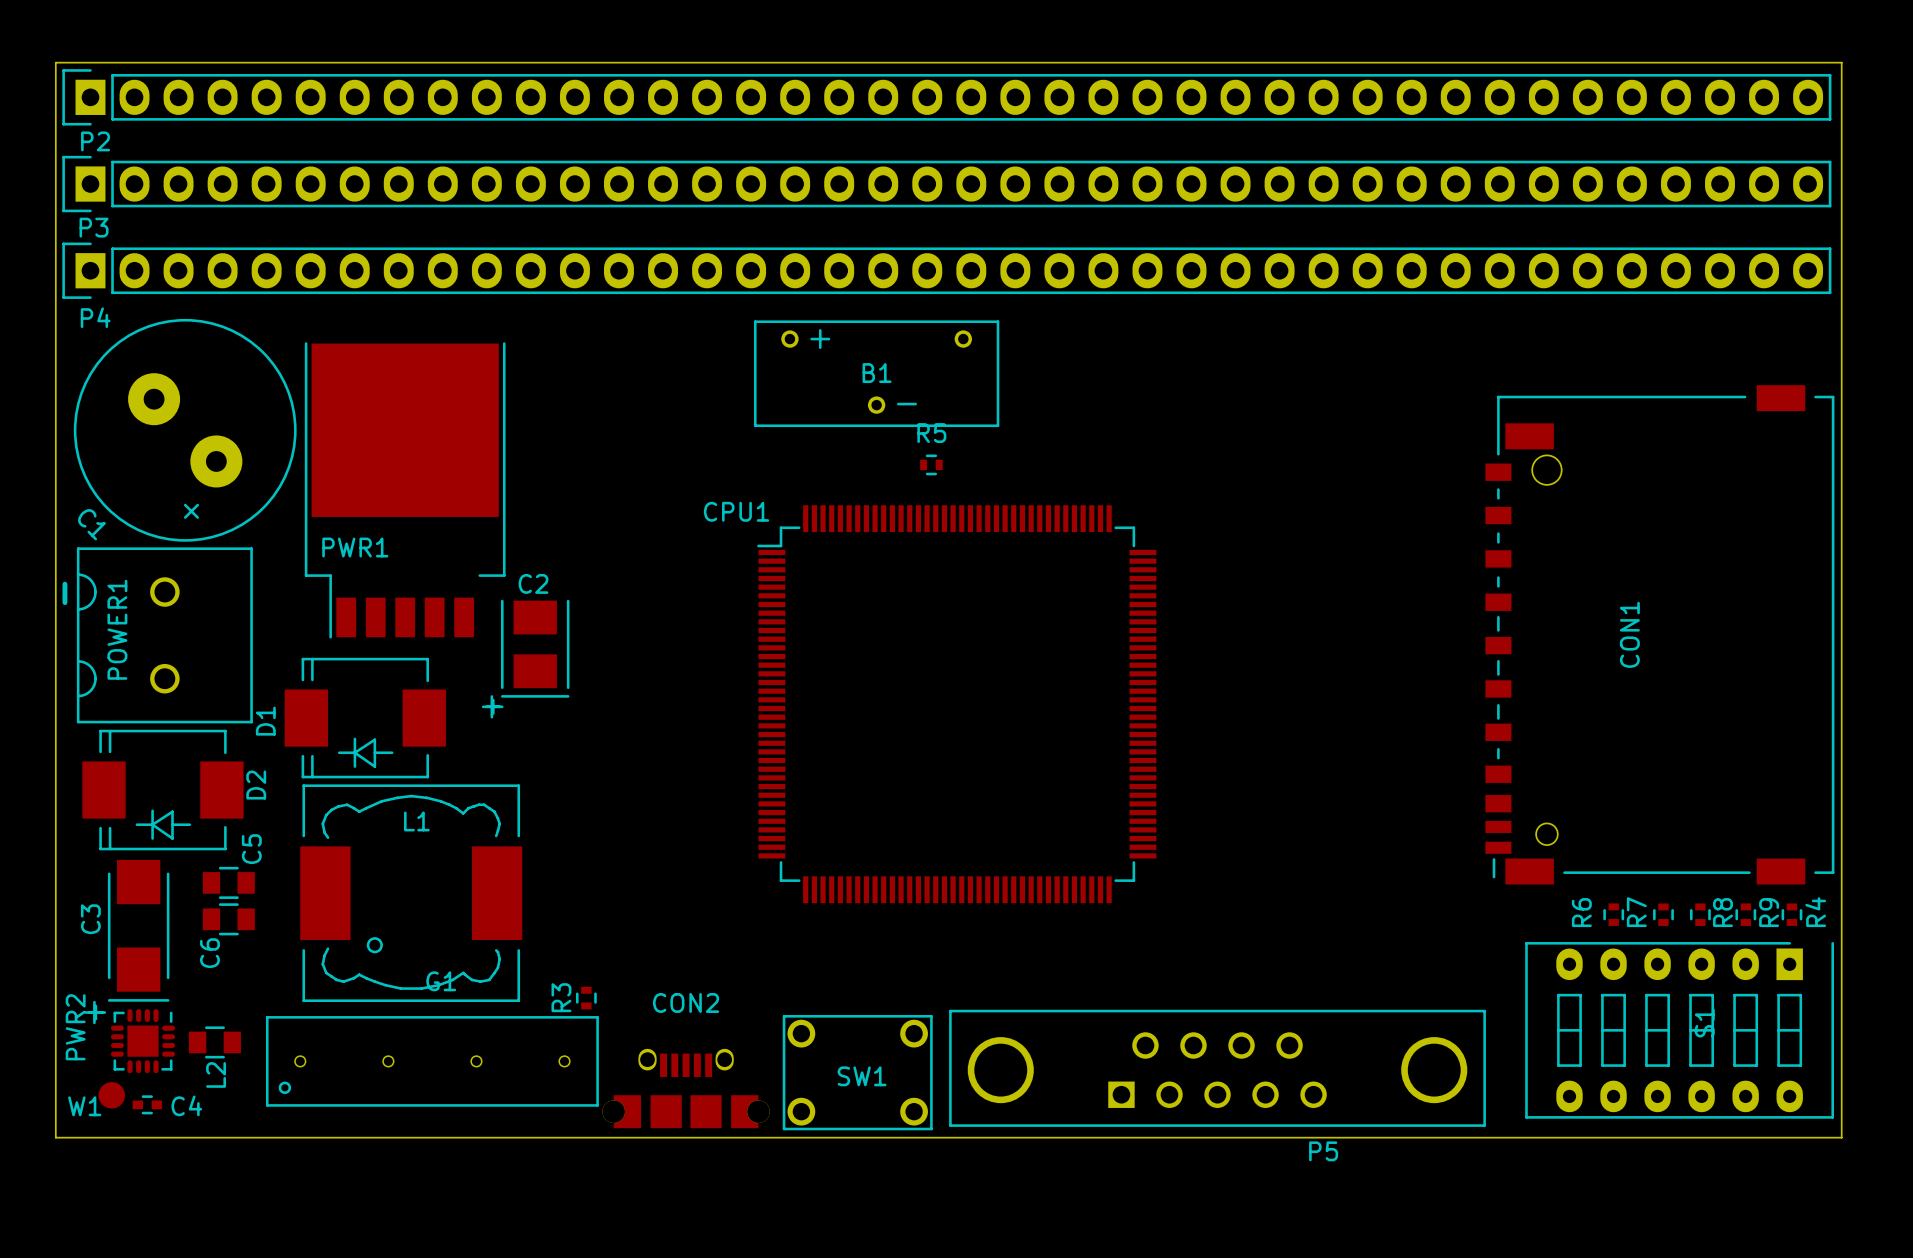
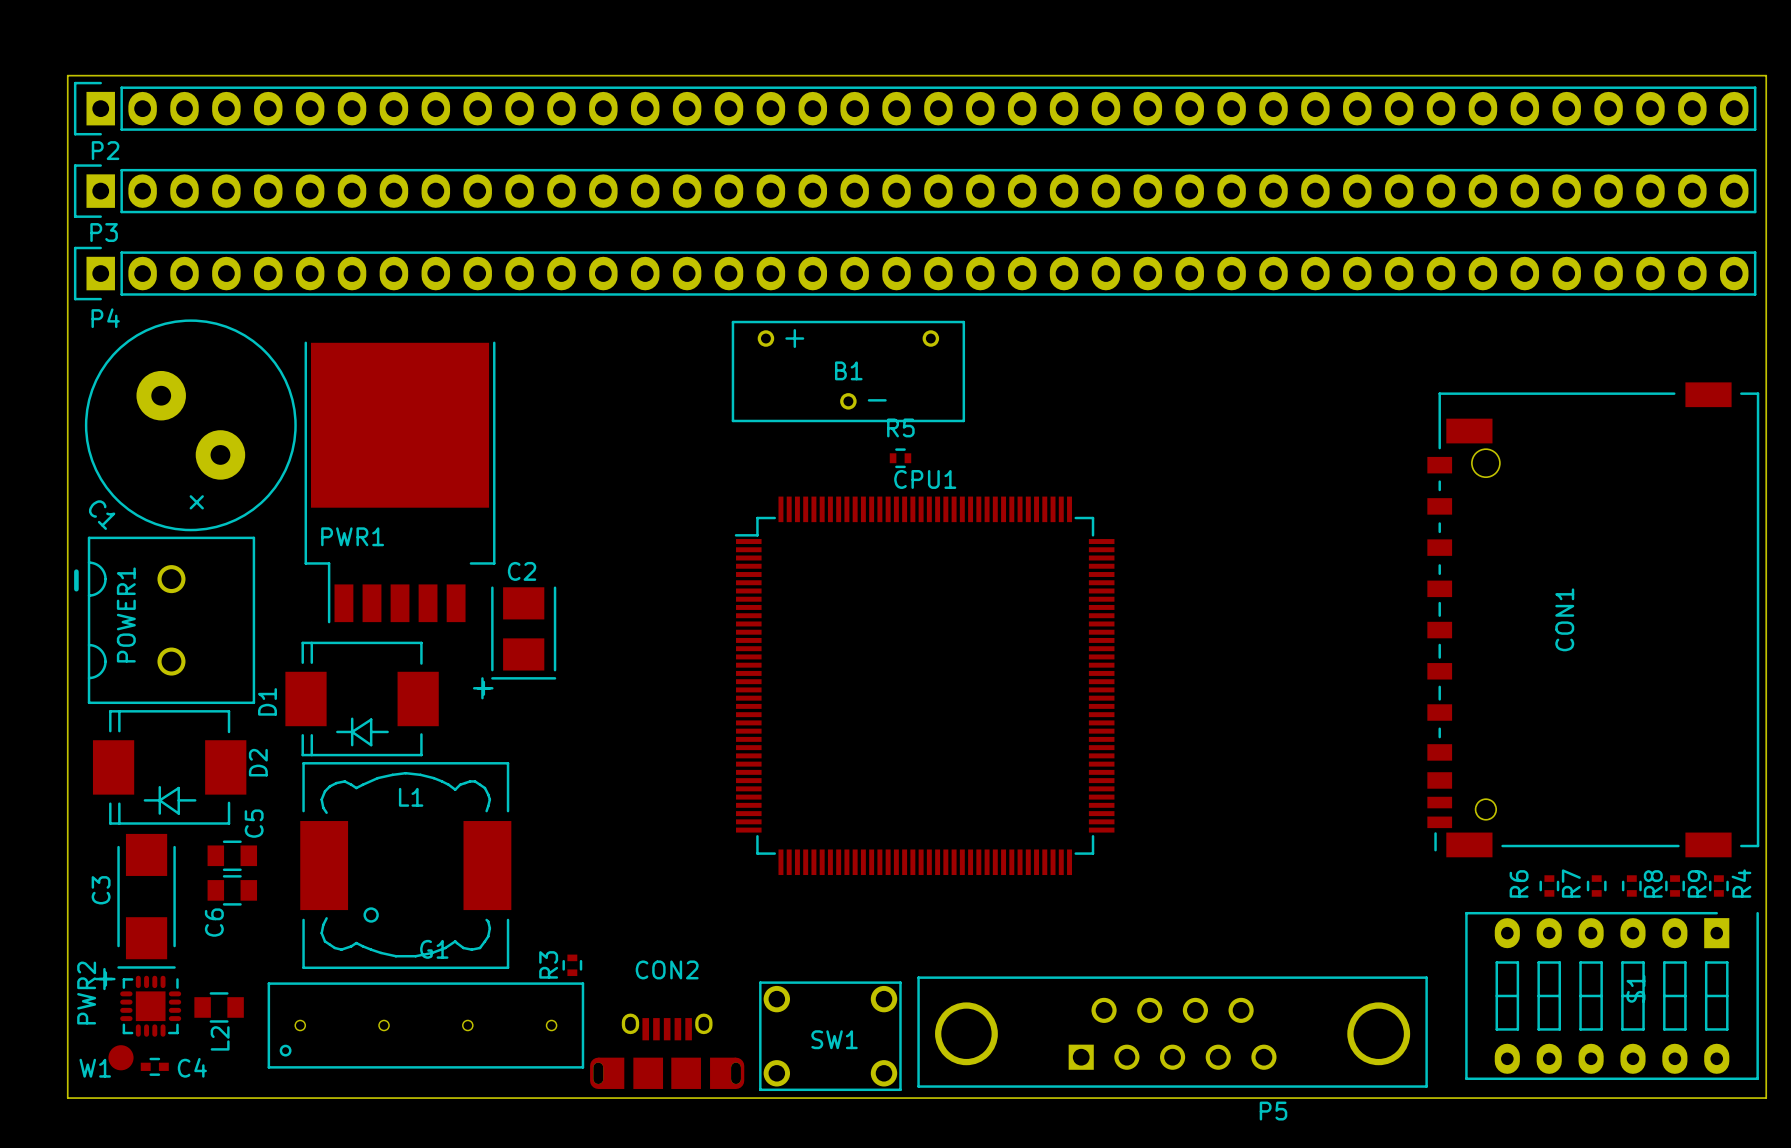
CPU1 name position: CPU1 (736, 511) -> CPU1 (925, 479)
CON2 footprint: [602, 1048, 770, 1129] -> [590, 1013, 745, 1089]

